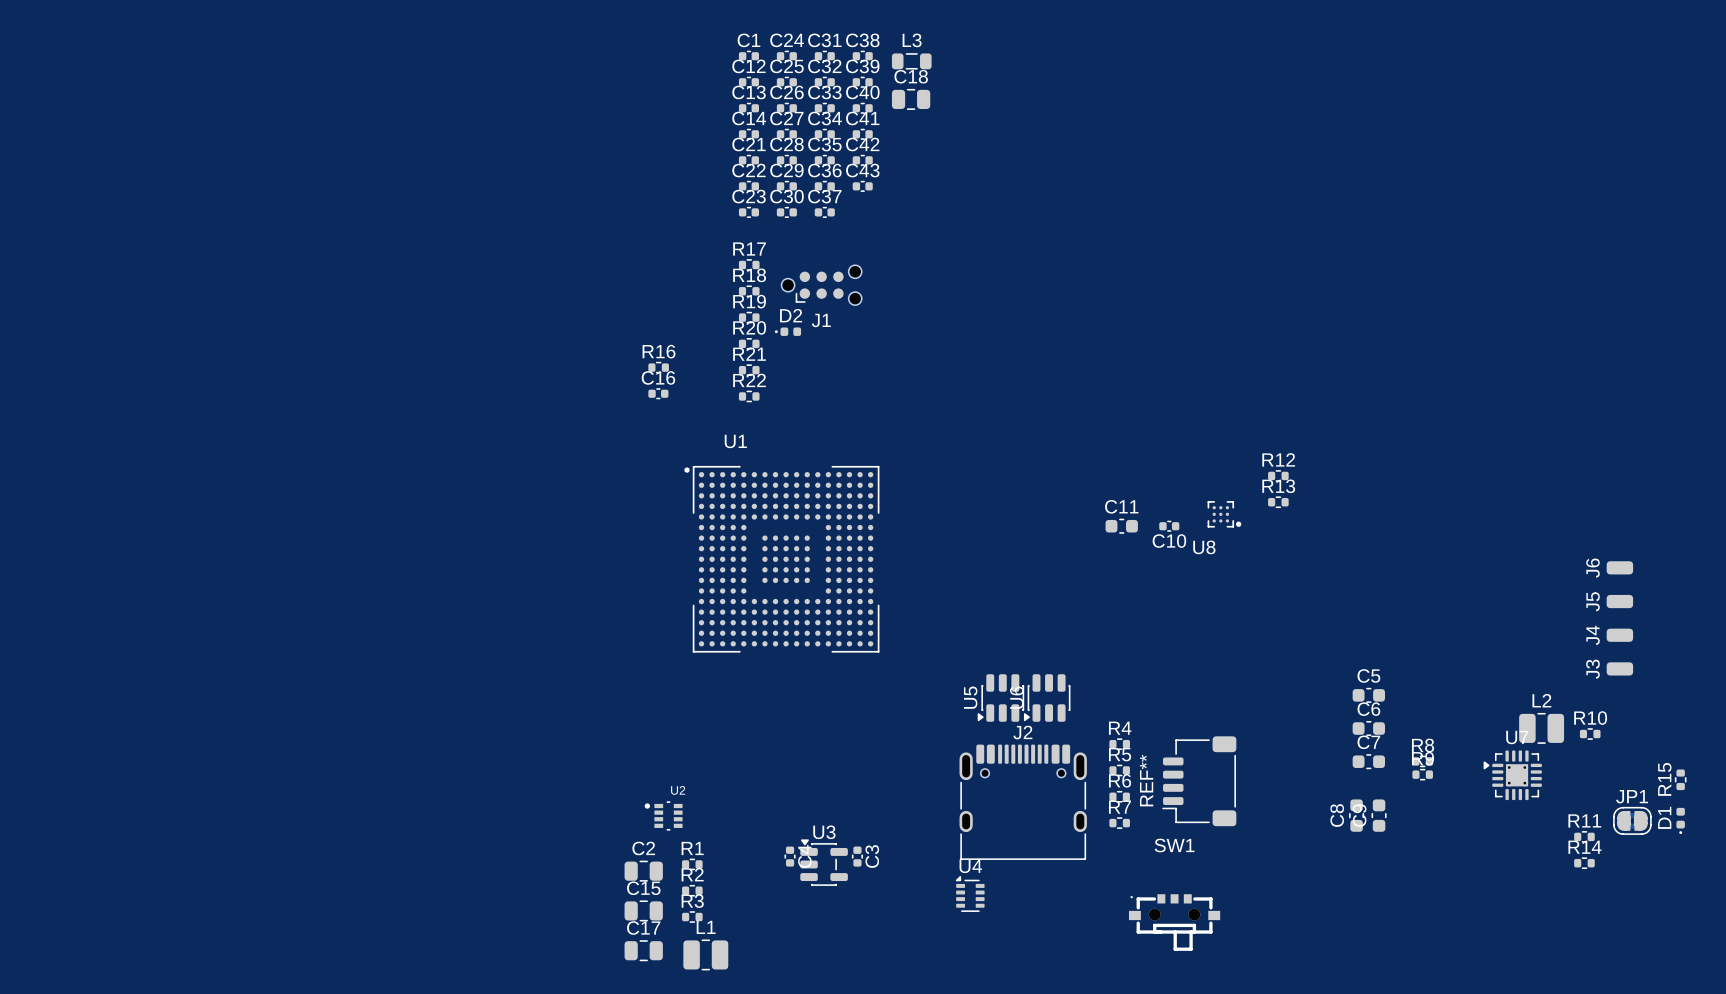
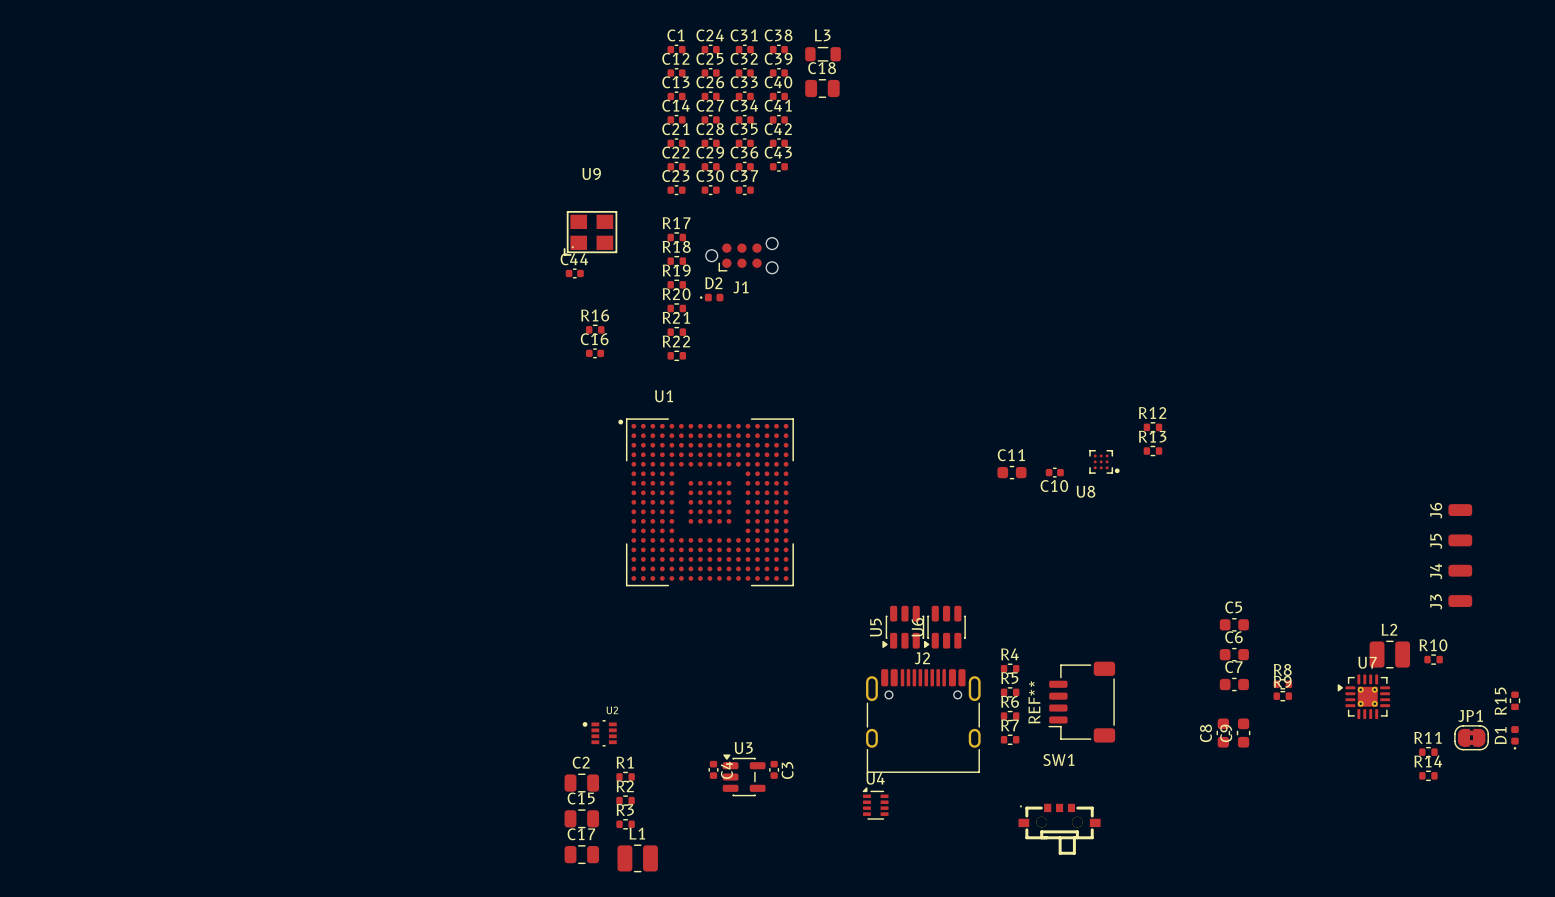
U9: none -> (590, 233)
C44: none -> (574, 273)

